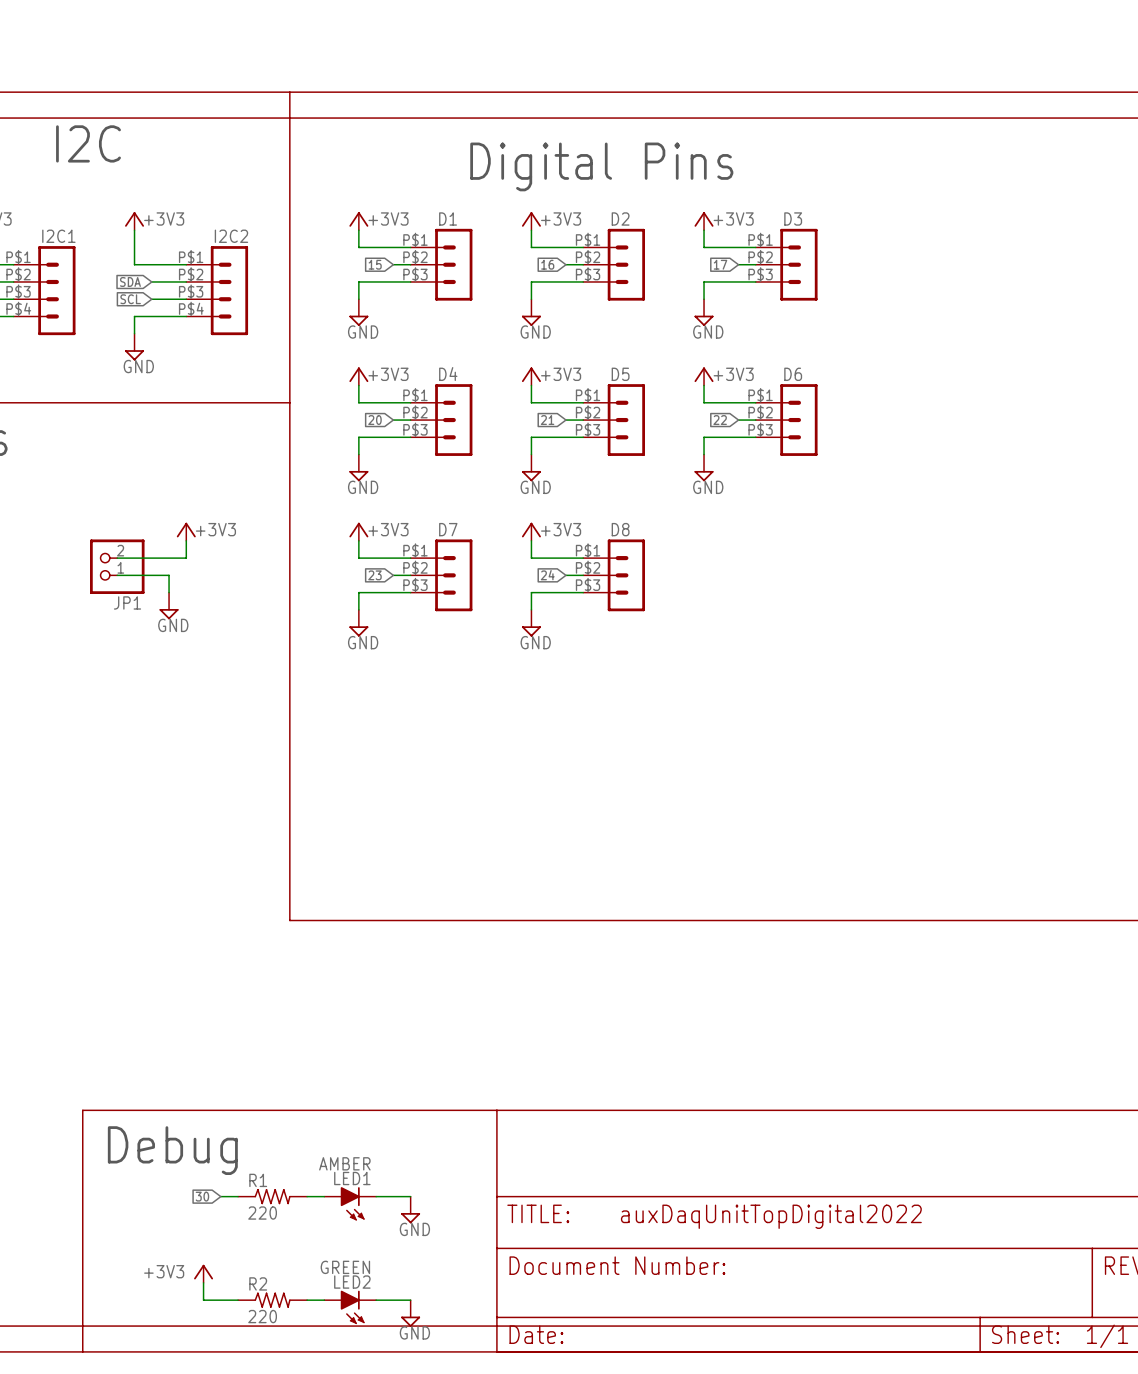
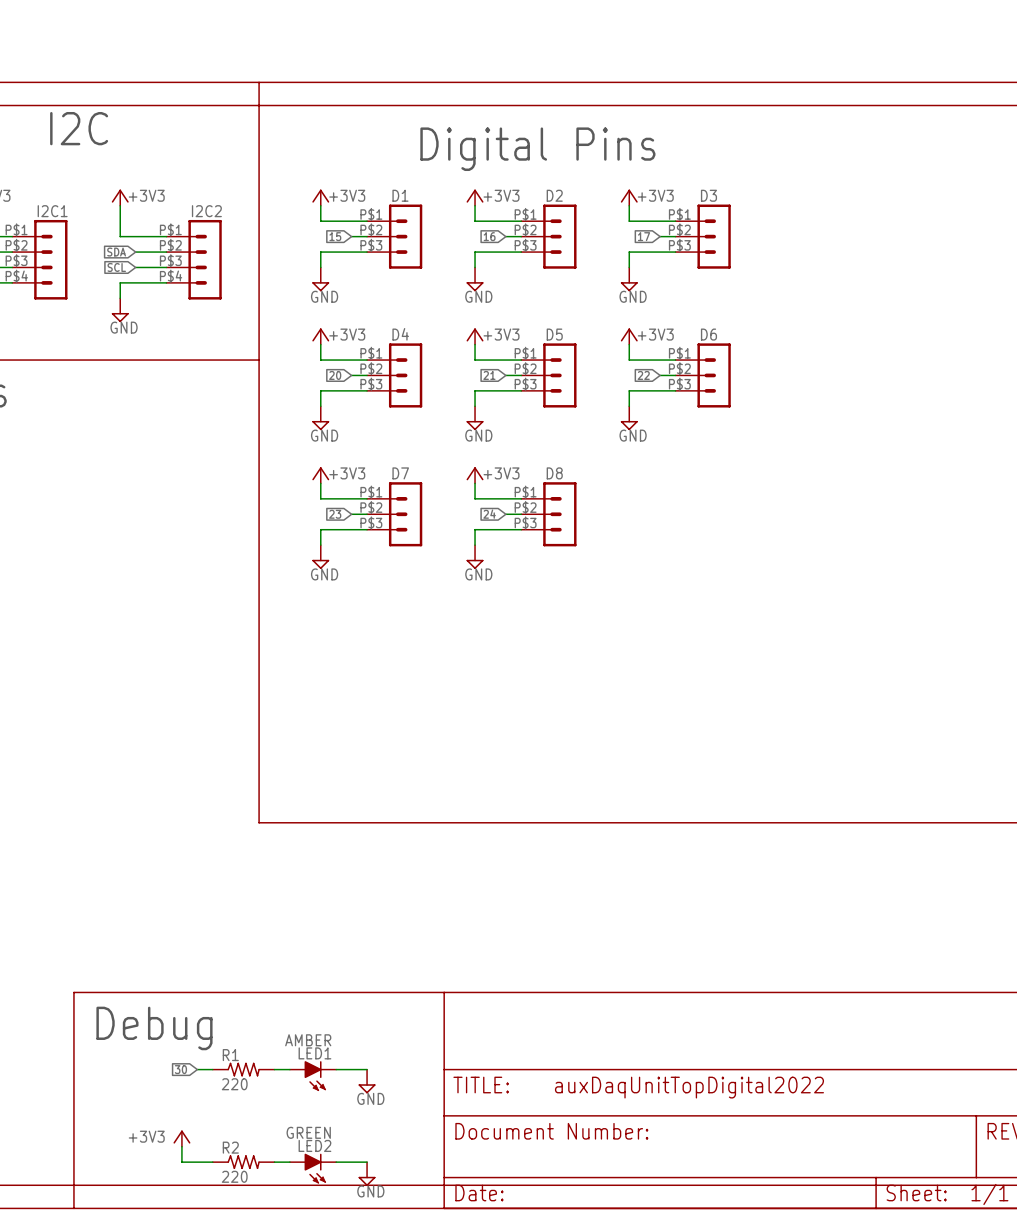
power symbol: +3V3 (186, 531) -> none
wire: (186, 540) (186, 558) (117, 558) -> none
JP1: (117, 566) -> none
wire: (117, 575) (169, 575) (169, 592) -> none
power symbol: GND (169, 605) -> none

